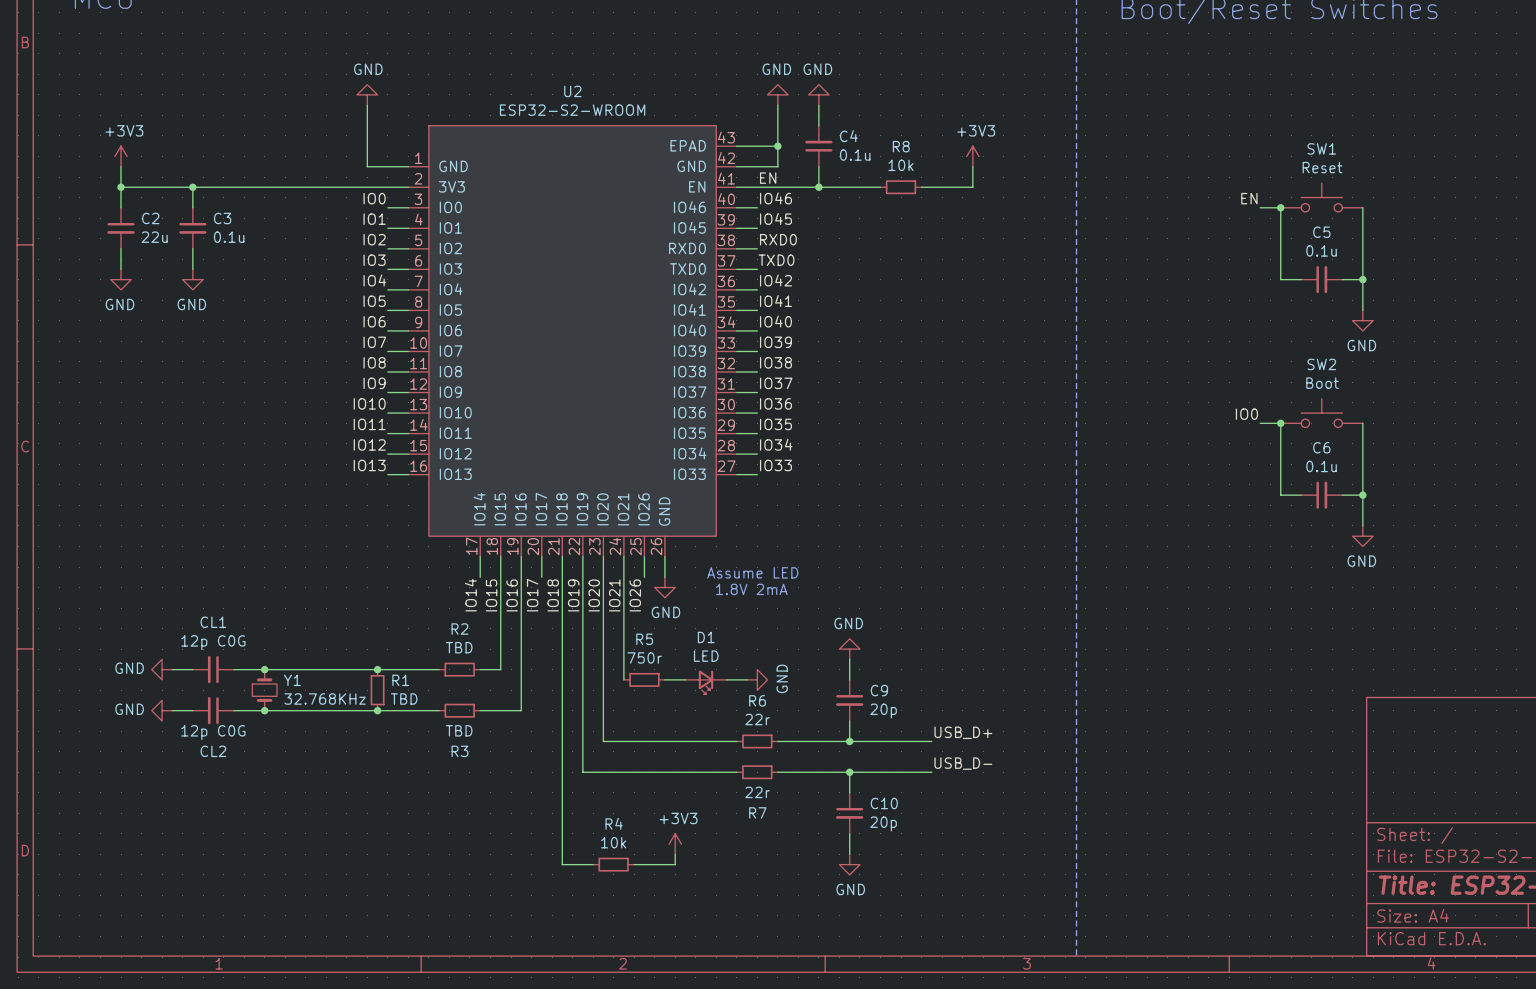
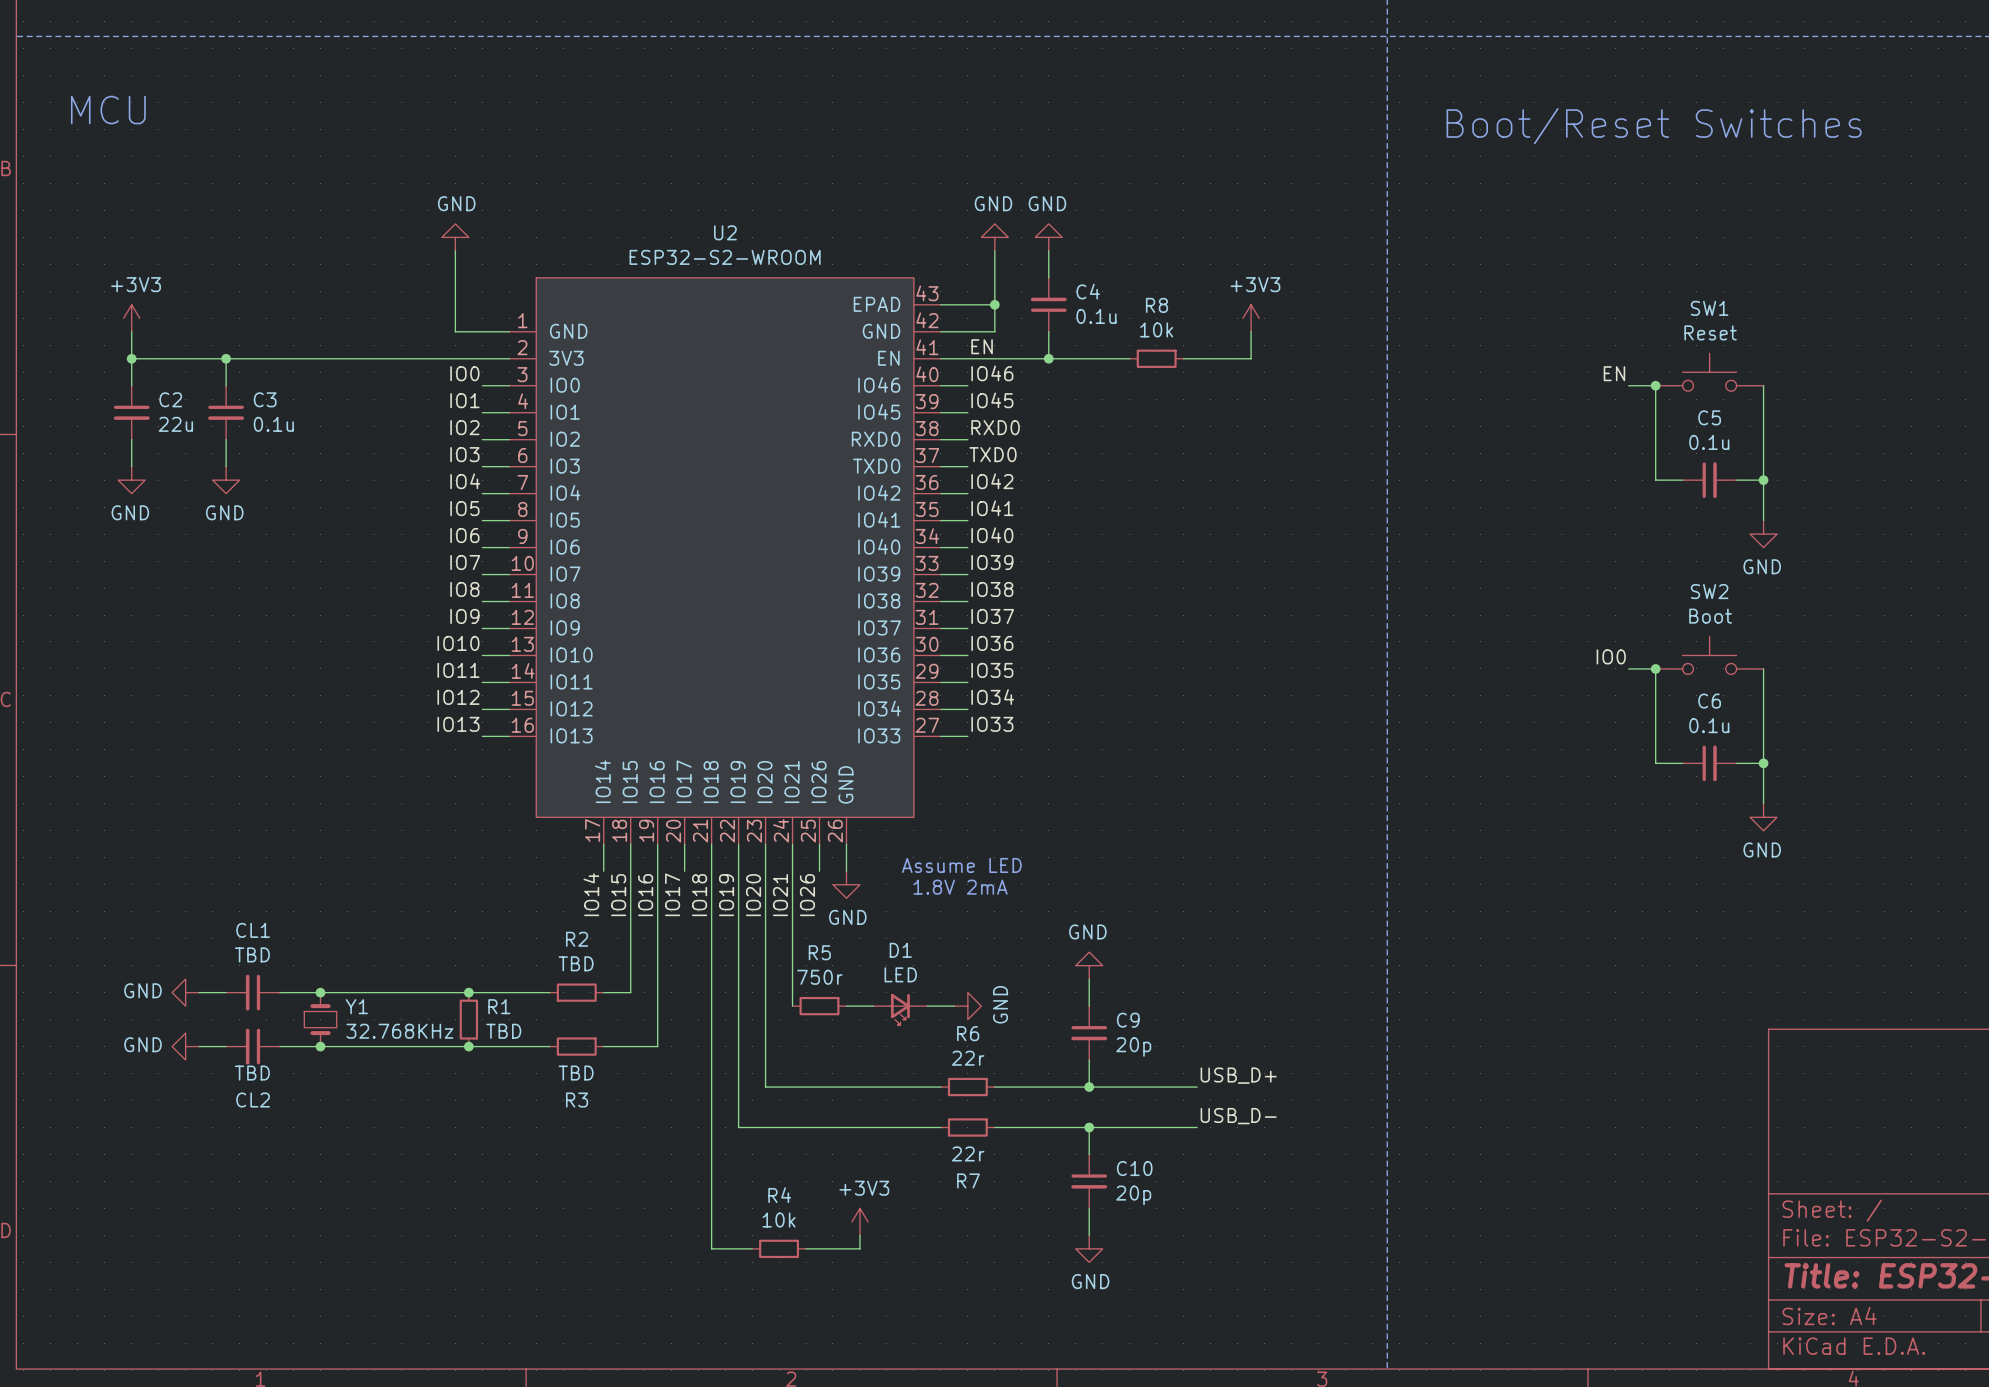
CL1 value: 12p C0G (213, 642) -> TBD (252, 954)
CL2 value: 12p C0G (213, 732) -> TBD (252, 1073)

